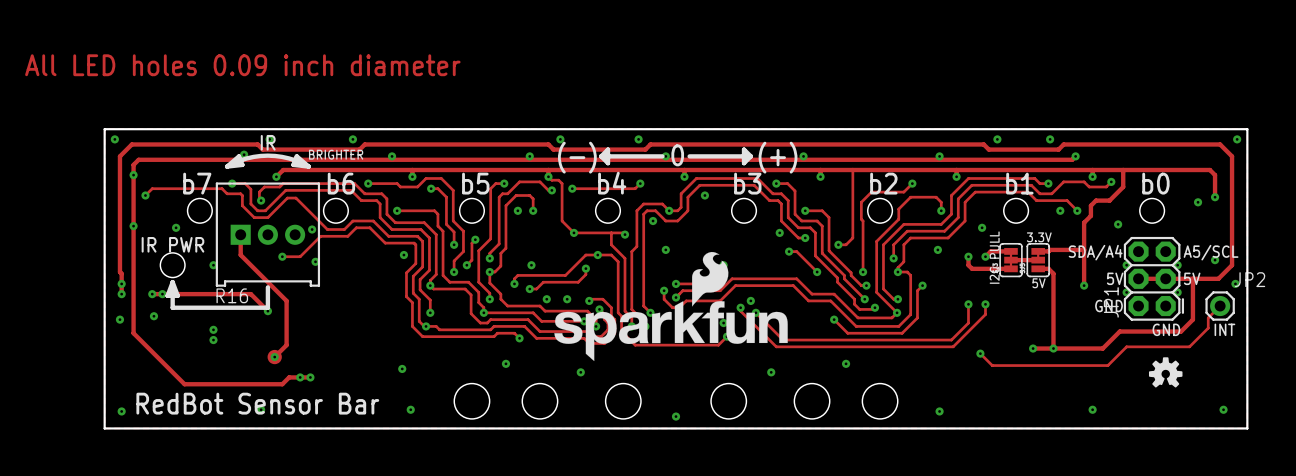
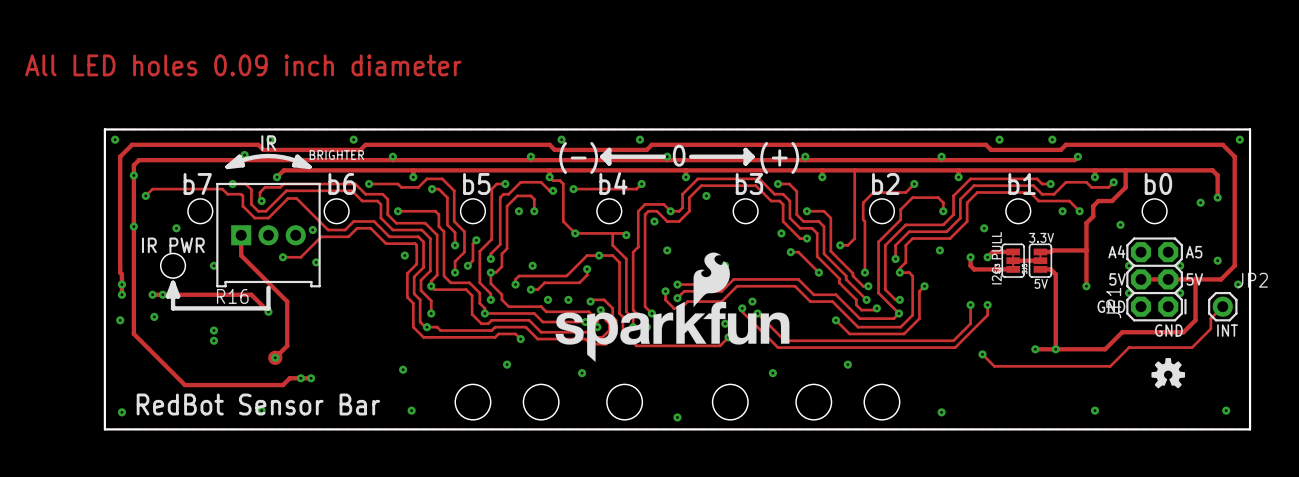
text: SDA/A4 (1095, 252) -> A4 (1116, 251)
text: A5/SCL (1211, 252) -> A5 (1194, 252)

